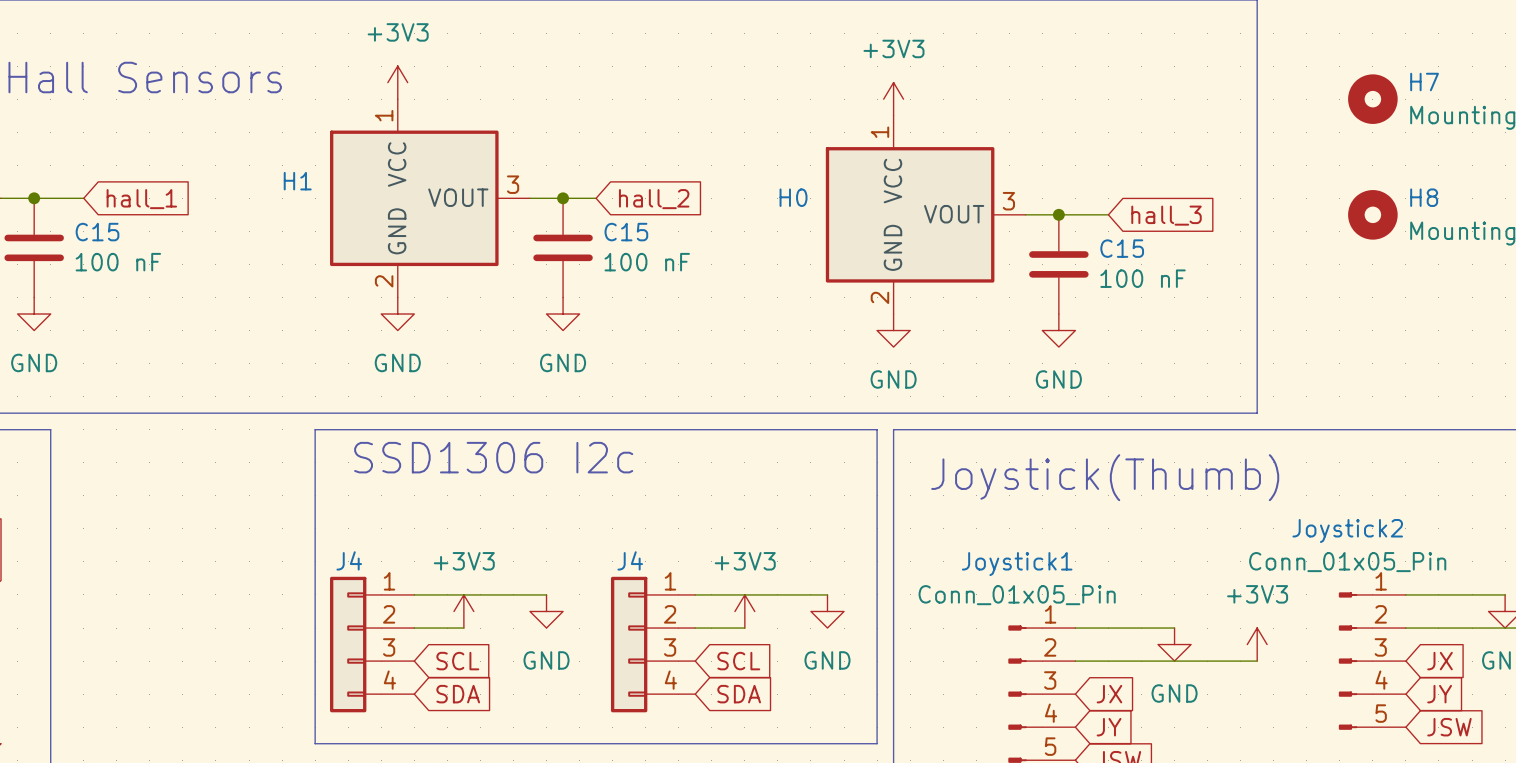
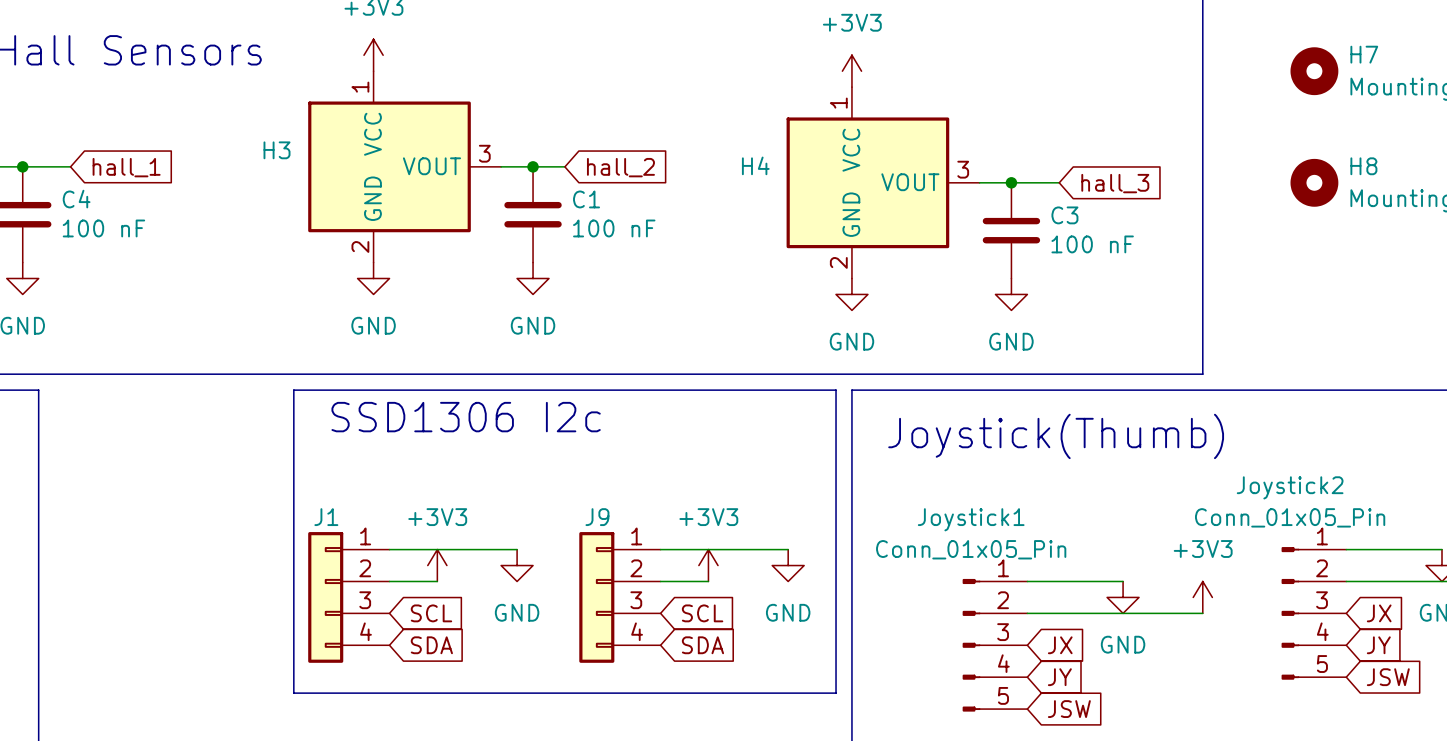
H1 name: H1 (297, 181) -> H3 (277, 150)
H0 name: H0 (793, 197) -> H4 (755, 165)
C15 name: C15 (97, 232) -> C4 (76, 199)
C15 name: C15 (626, 232) -> C1 (586, 199)
C15 name: C15 (1122, 248) -> C3 (1064, 215)
J4 name: J4 (349, 560) -> J1 (326, 517)
J4 name: J4 (630, 560) -> J9 (597, 517)

